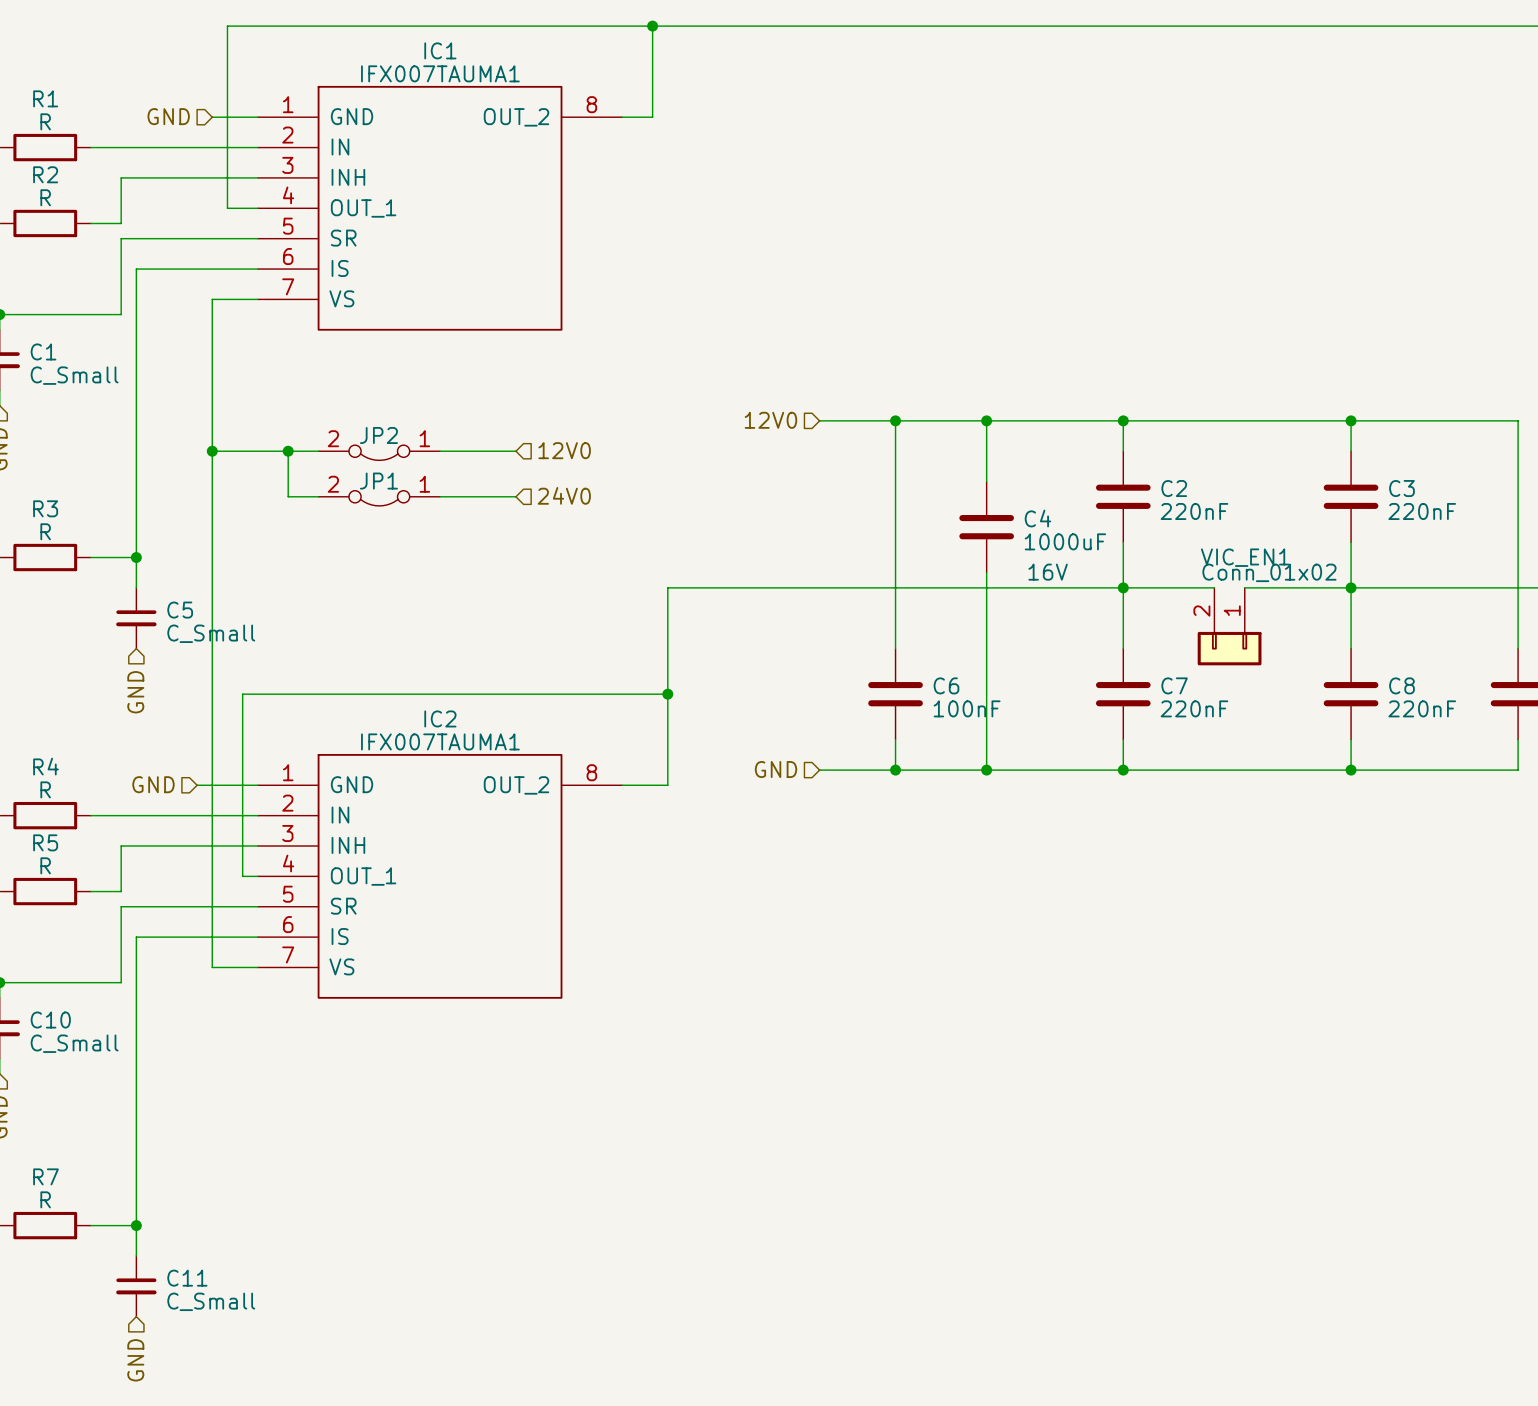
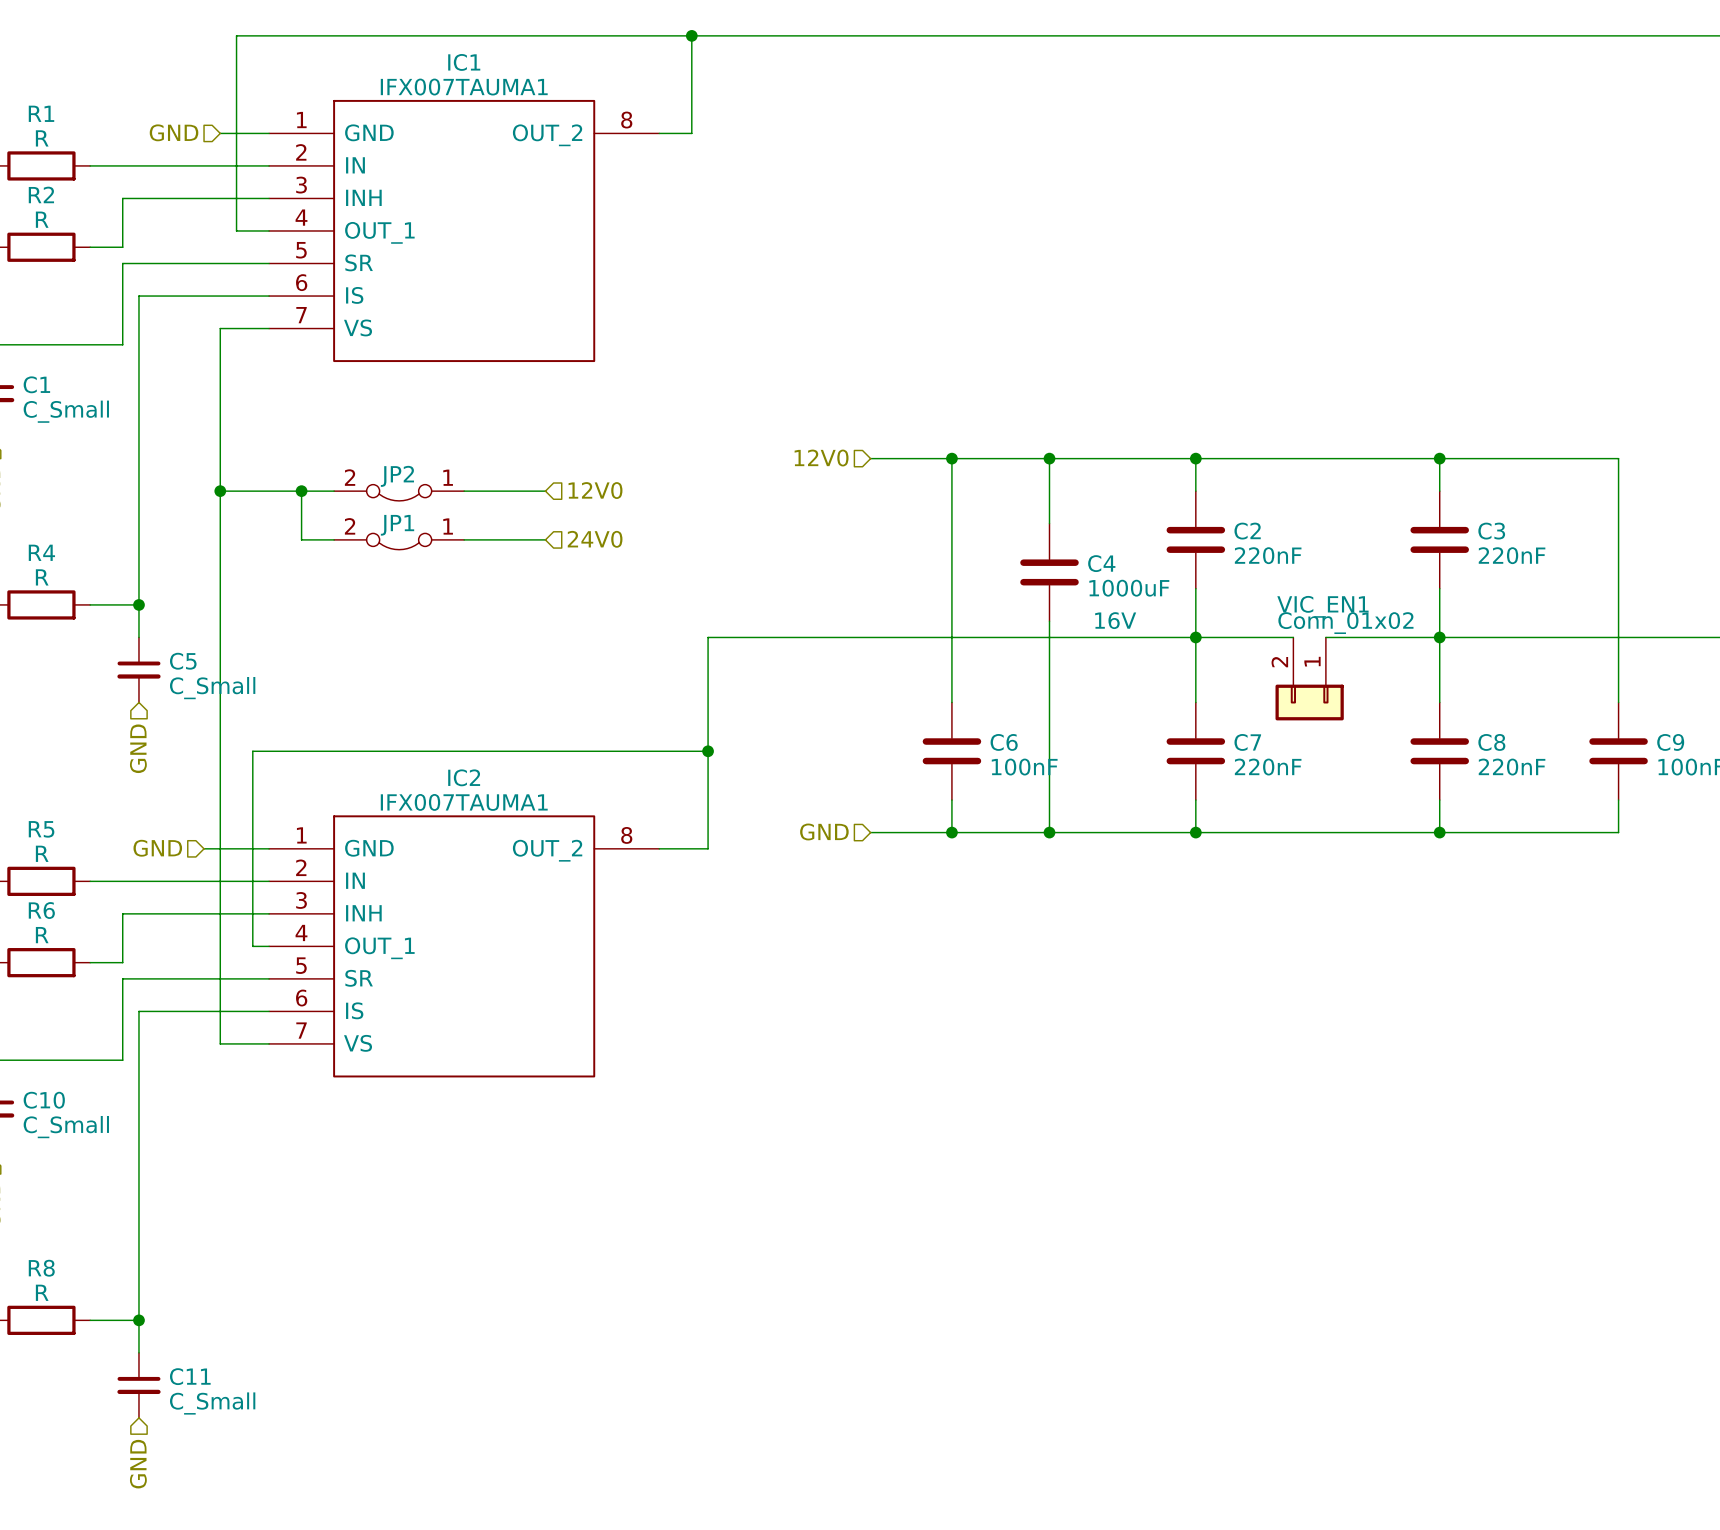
R3 name: R3 (45, 508) -> R4 (41, 552)
R4 name: R4 (45, 766) -> R5 (41, 829)
R5 name: R5 (45, 842) -> R6 (41, 910)
R7 name: R7 (45, 1176) -> R8 (41, 1268)

